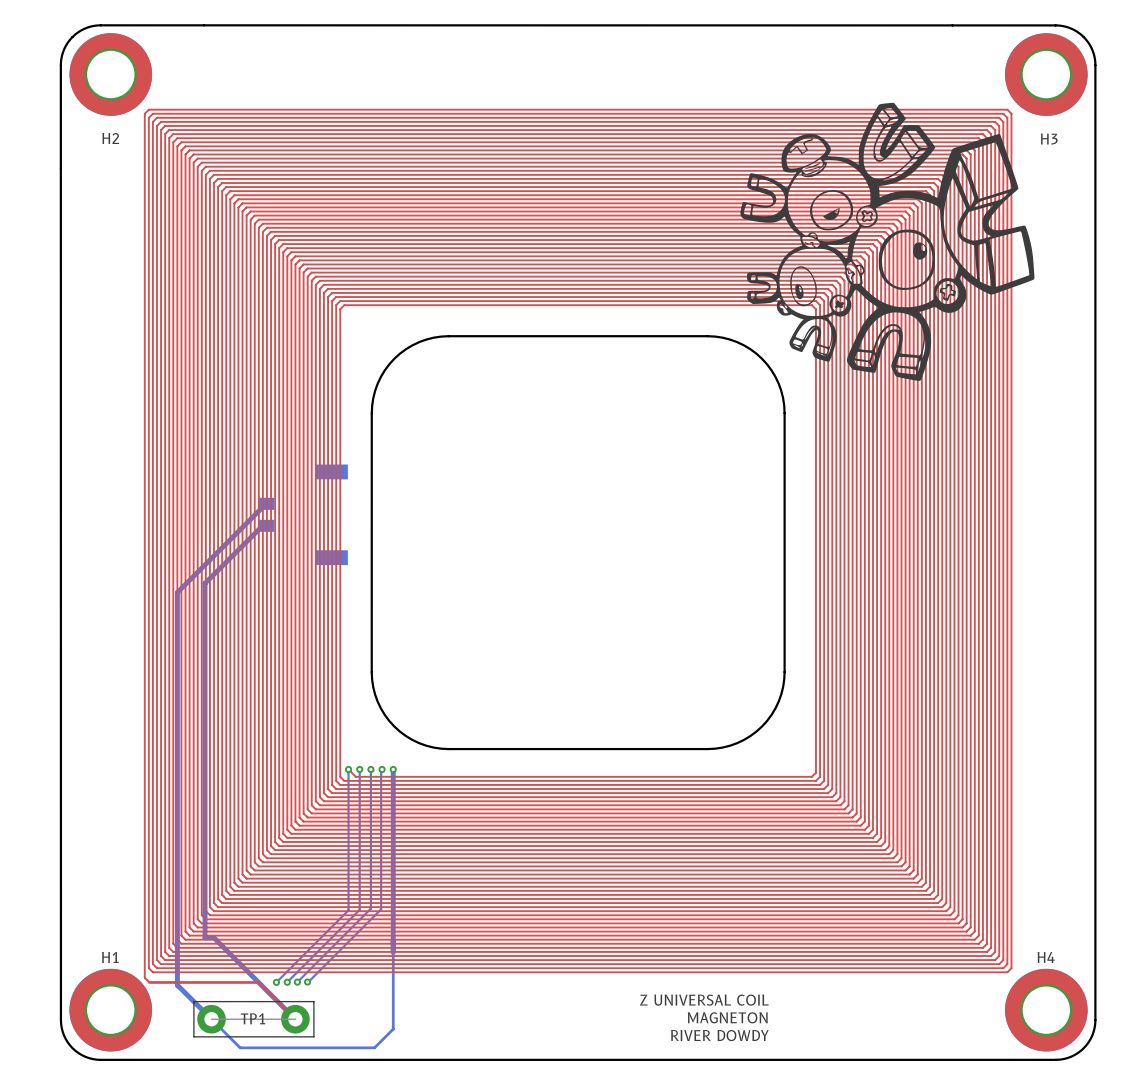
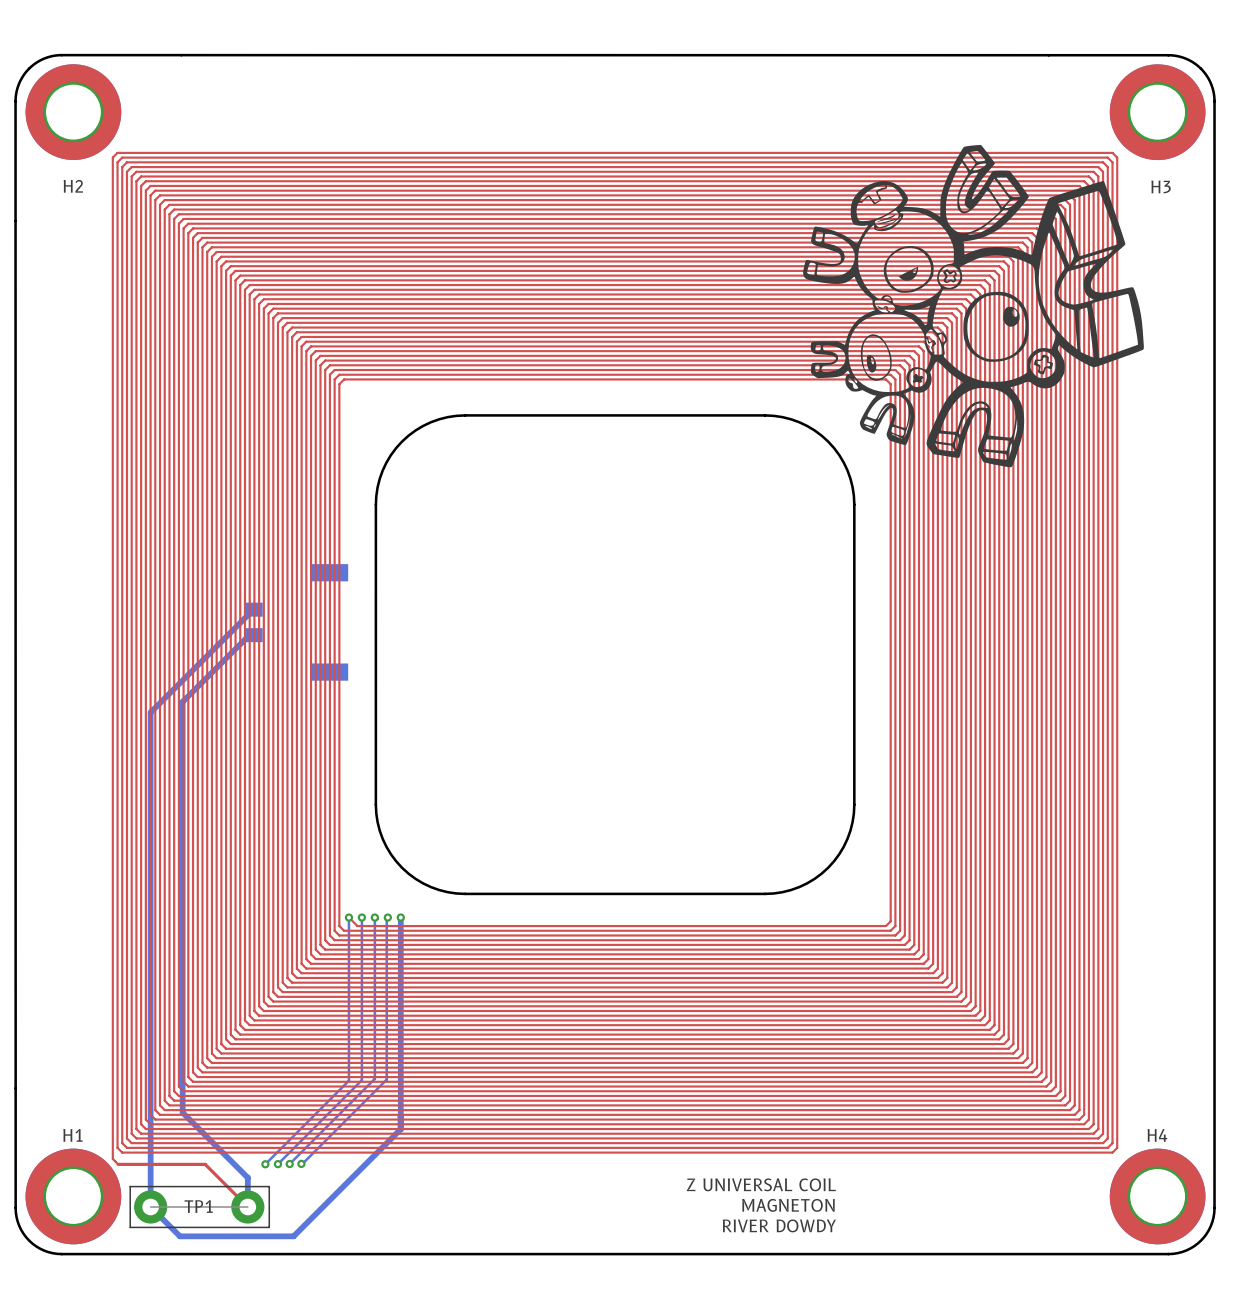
bottom track: (205, 937) (213, 937) (295, 1019) -> (182, 1112) (247, 1177) (247, 1207)
bottom track: (393, 952) (393, 1029) (374, 1047) (240, 1047) (177, 985) -> (400, 1129) (293, 1236) (179, 1236) (150, 1207) (150, 1167)
top track: (224, 982) (258, 982) (295, 1019) -> (205, 1164) (247, 1207)
TP1 position: (253, 1019) -> (199, 1207)

